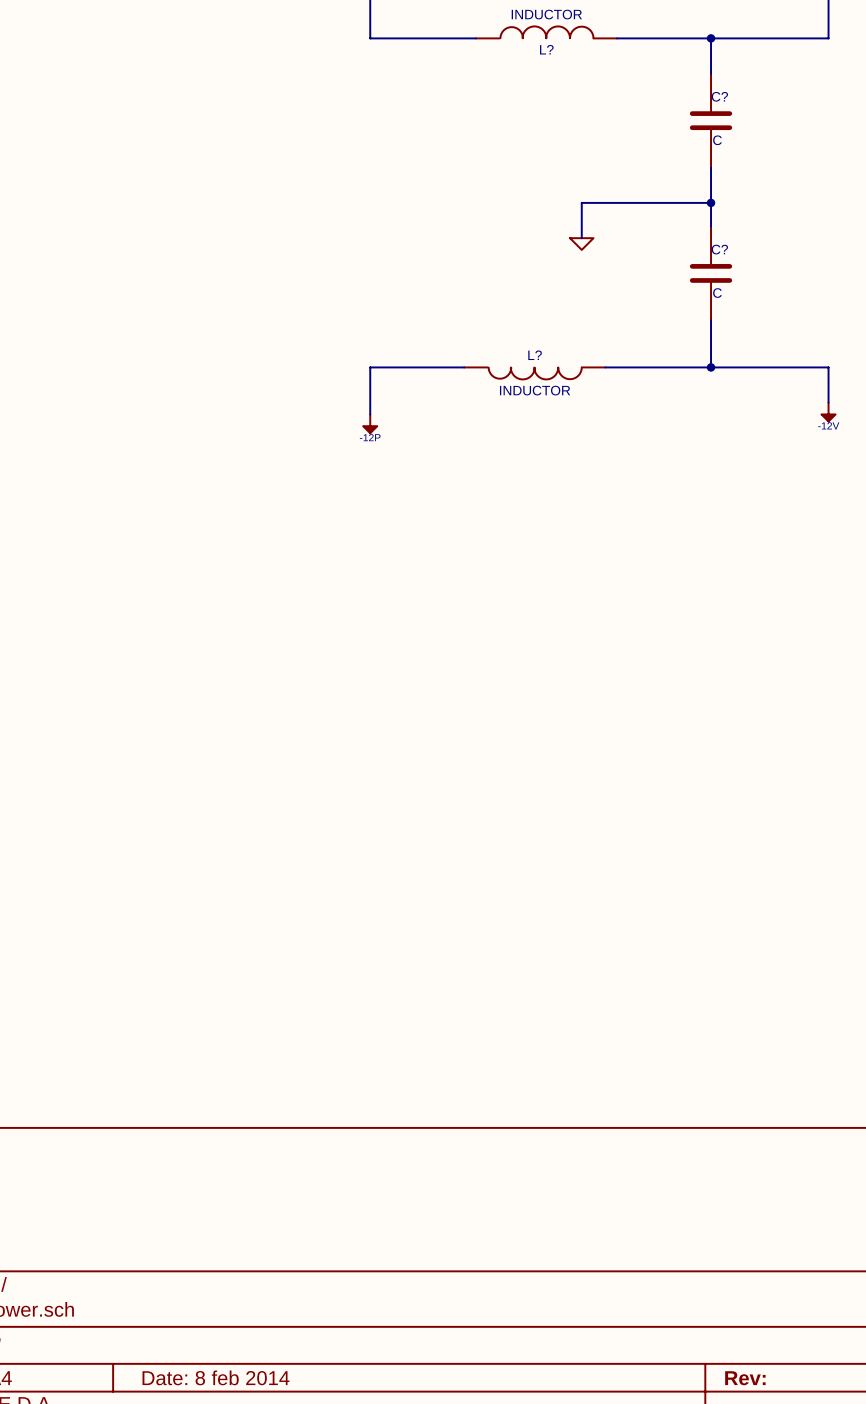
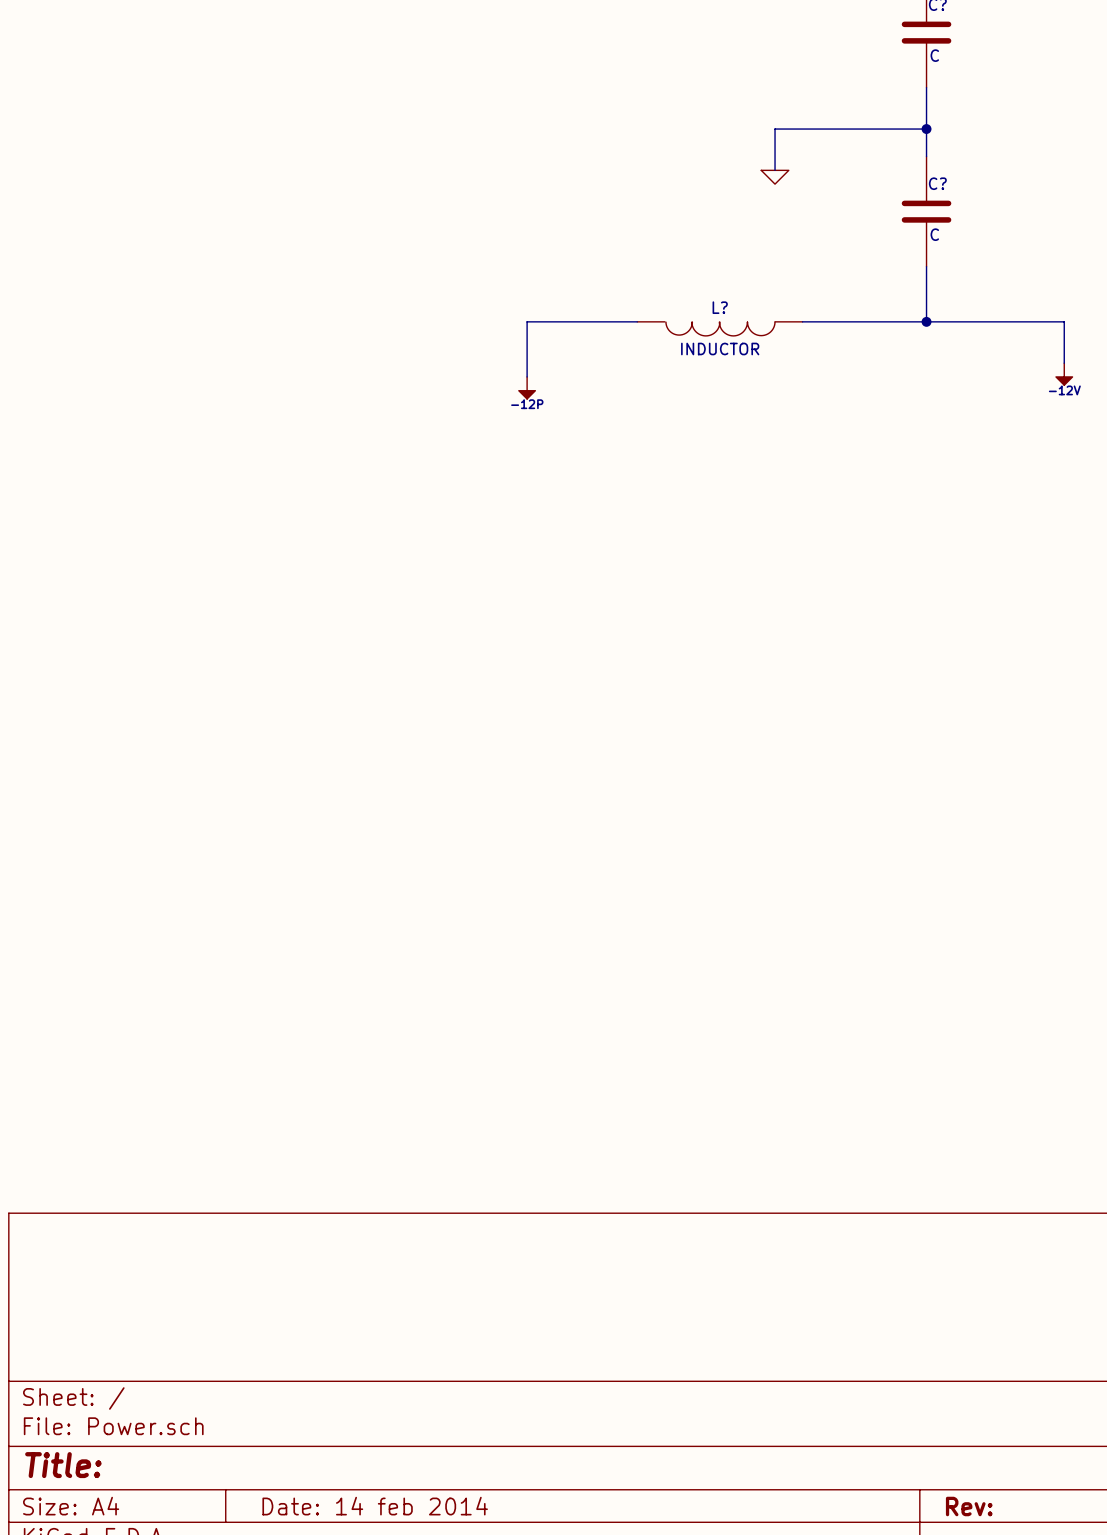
title block: Date: 8 feb 2014 (216, 1377) -> Date: 14 feb 2014 (375, 1506)

